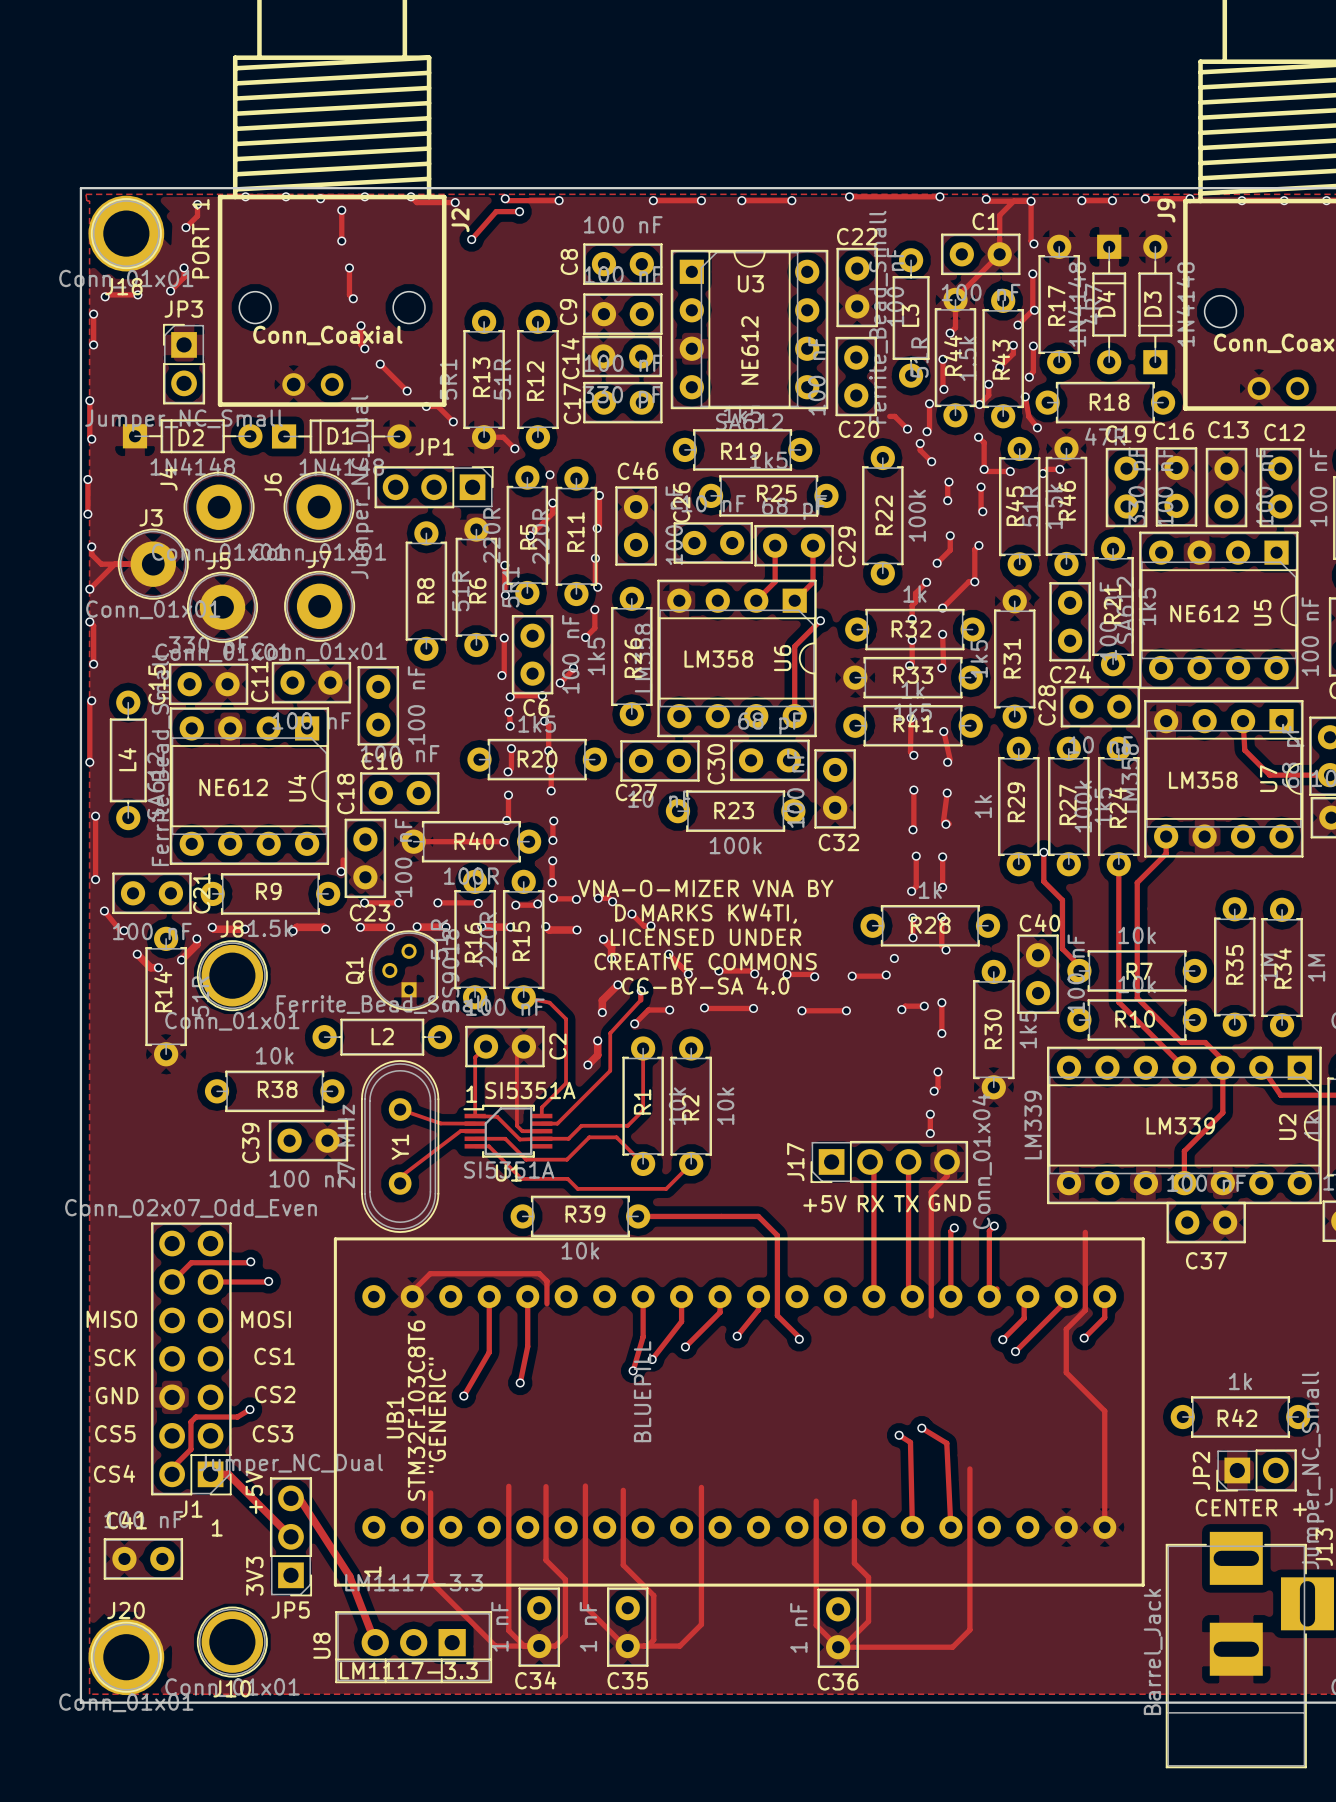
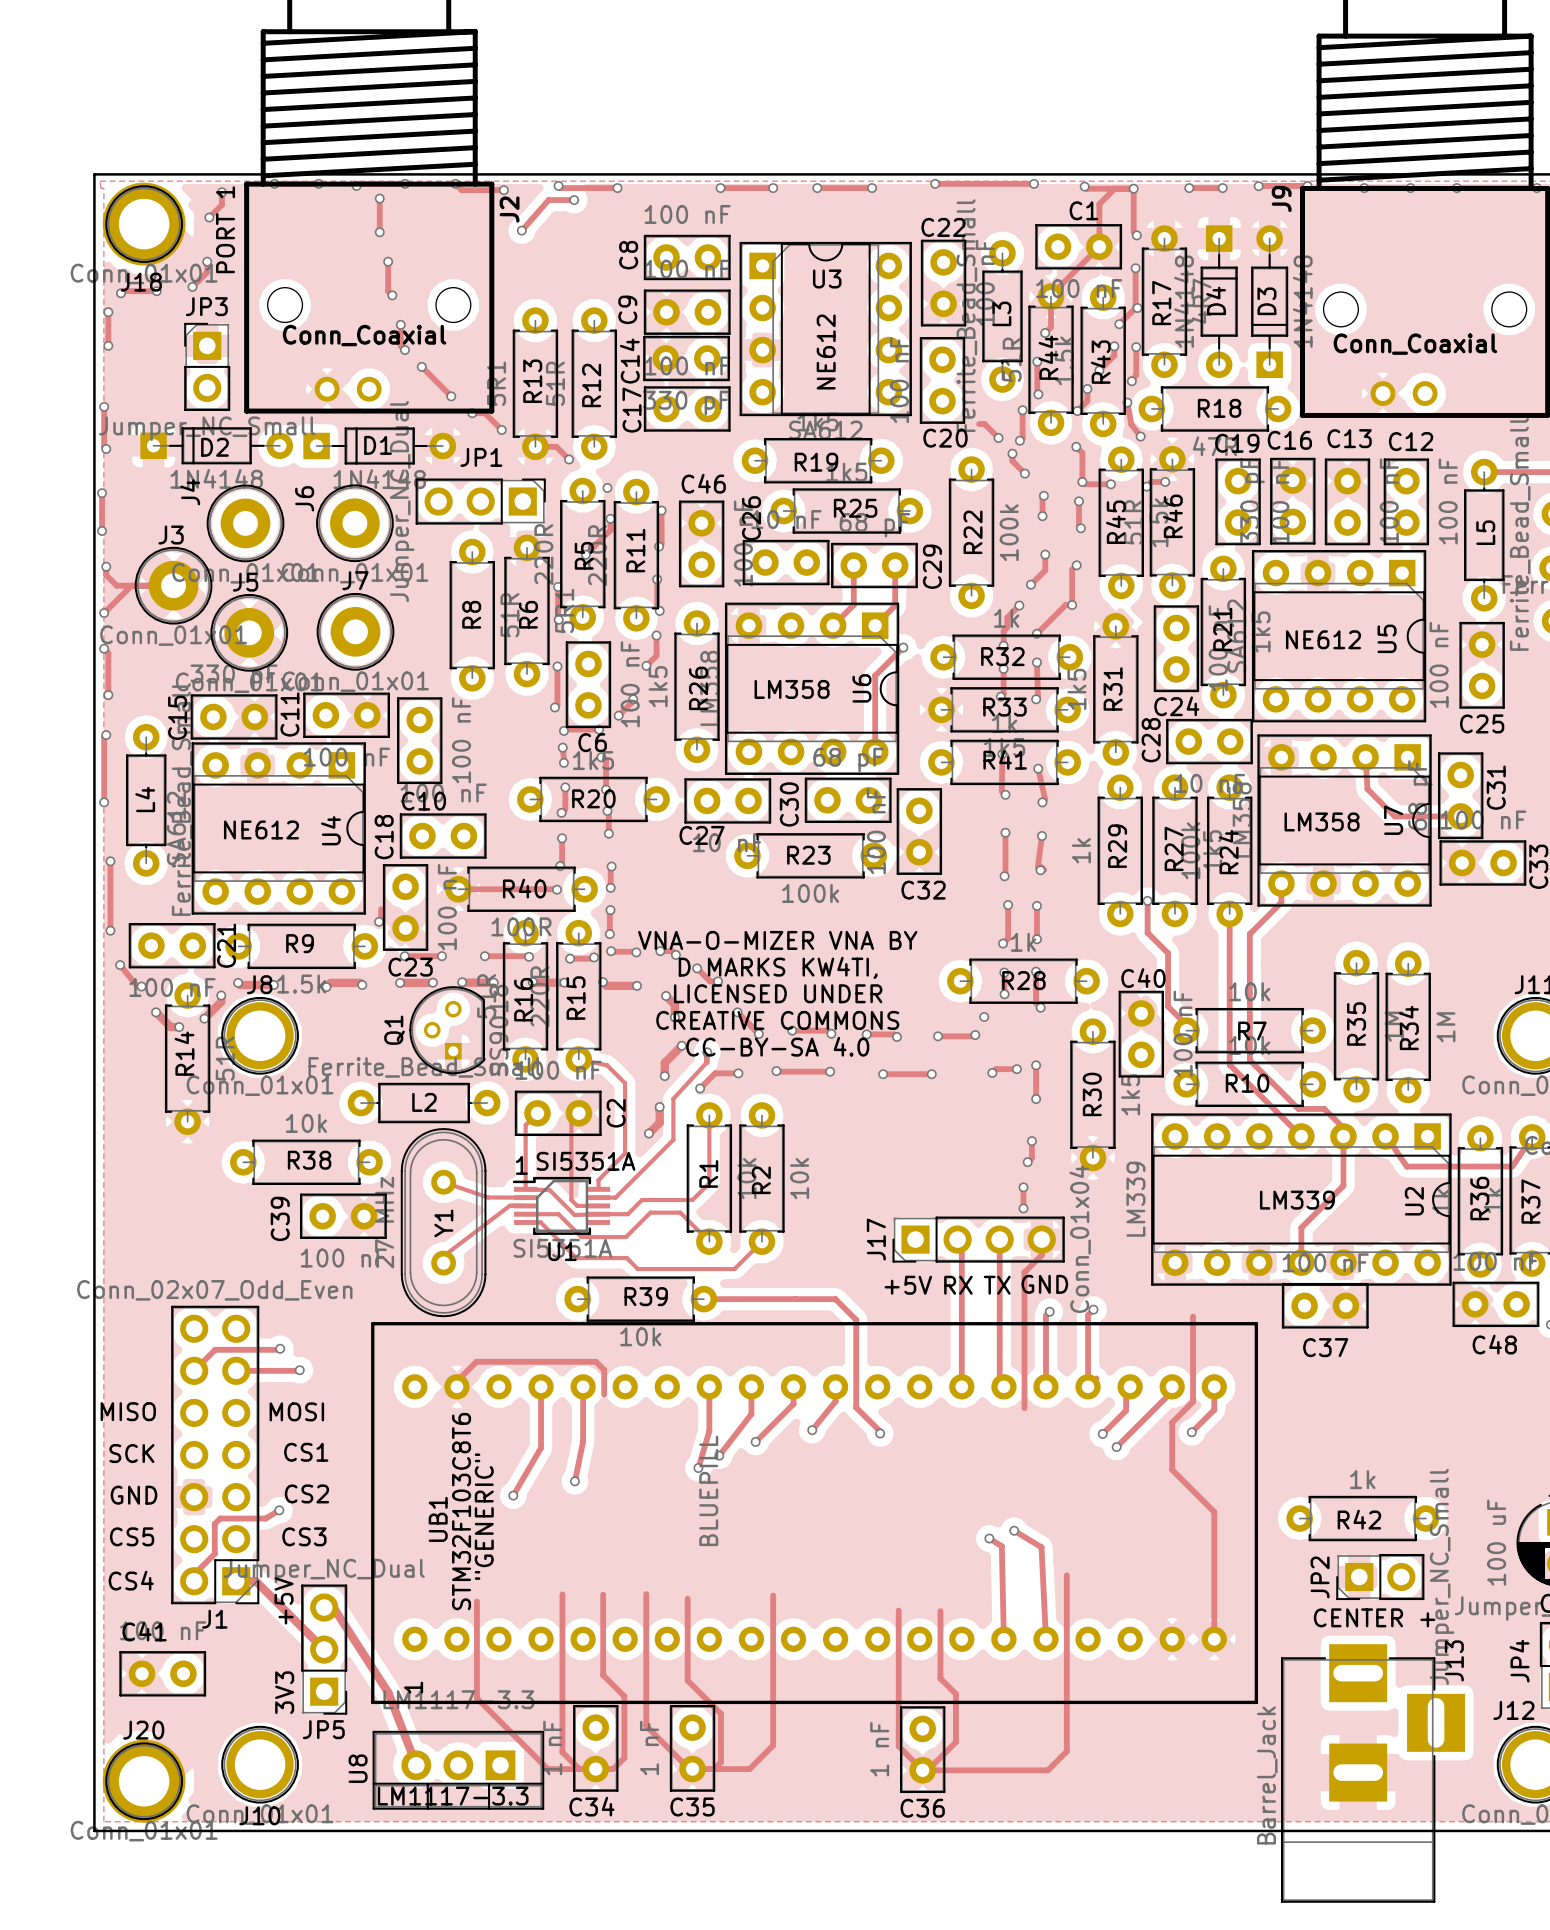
text: 1 (217, 1527) -> none

